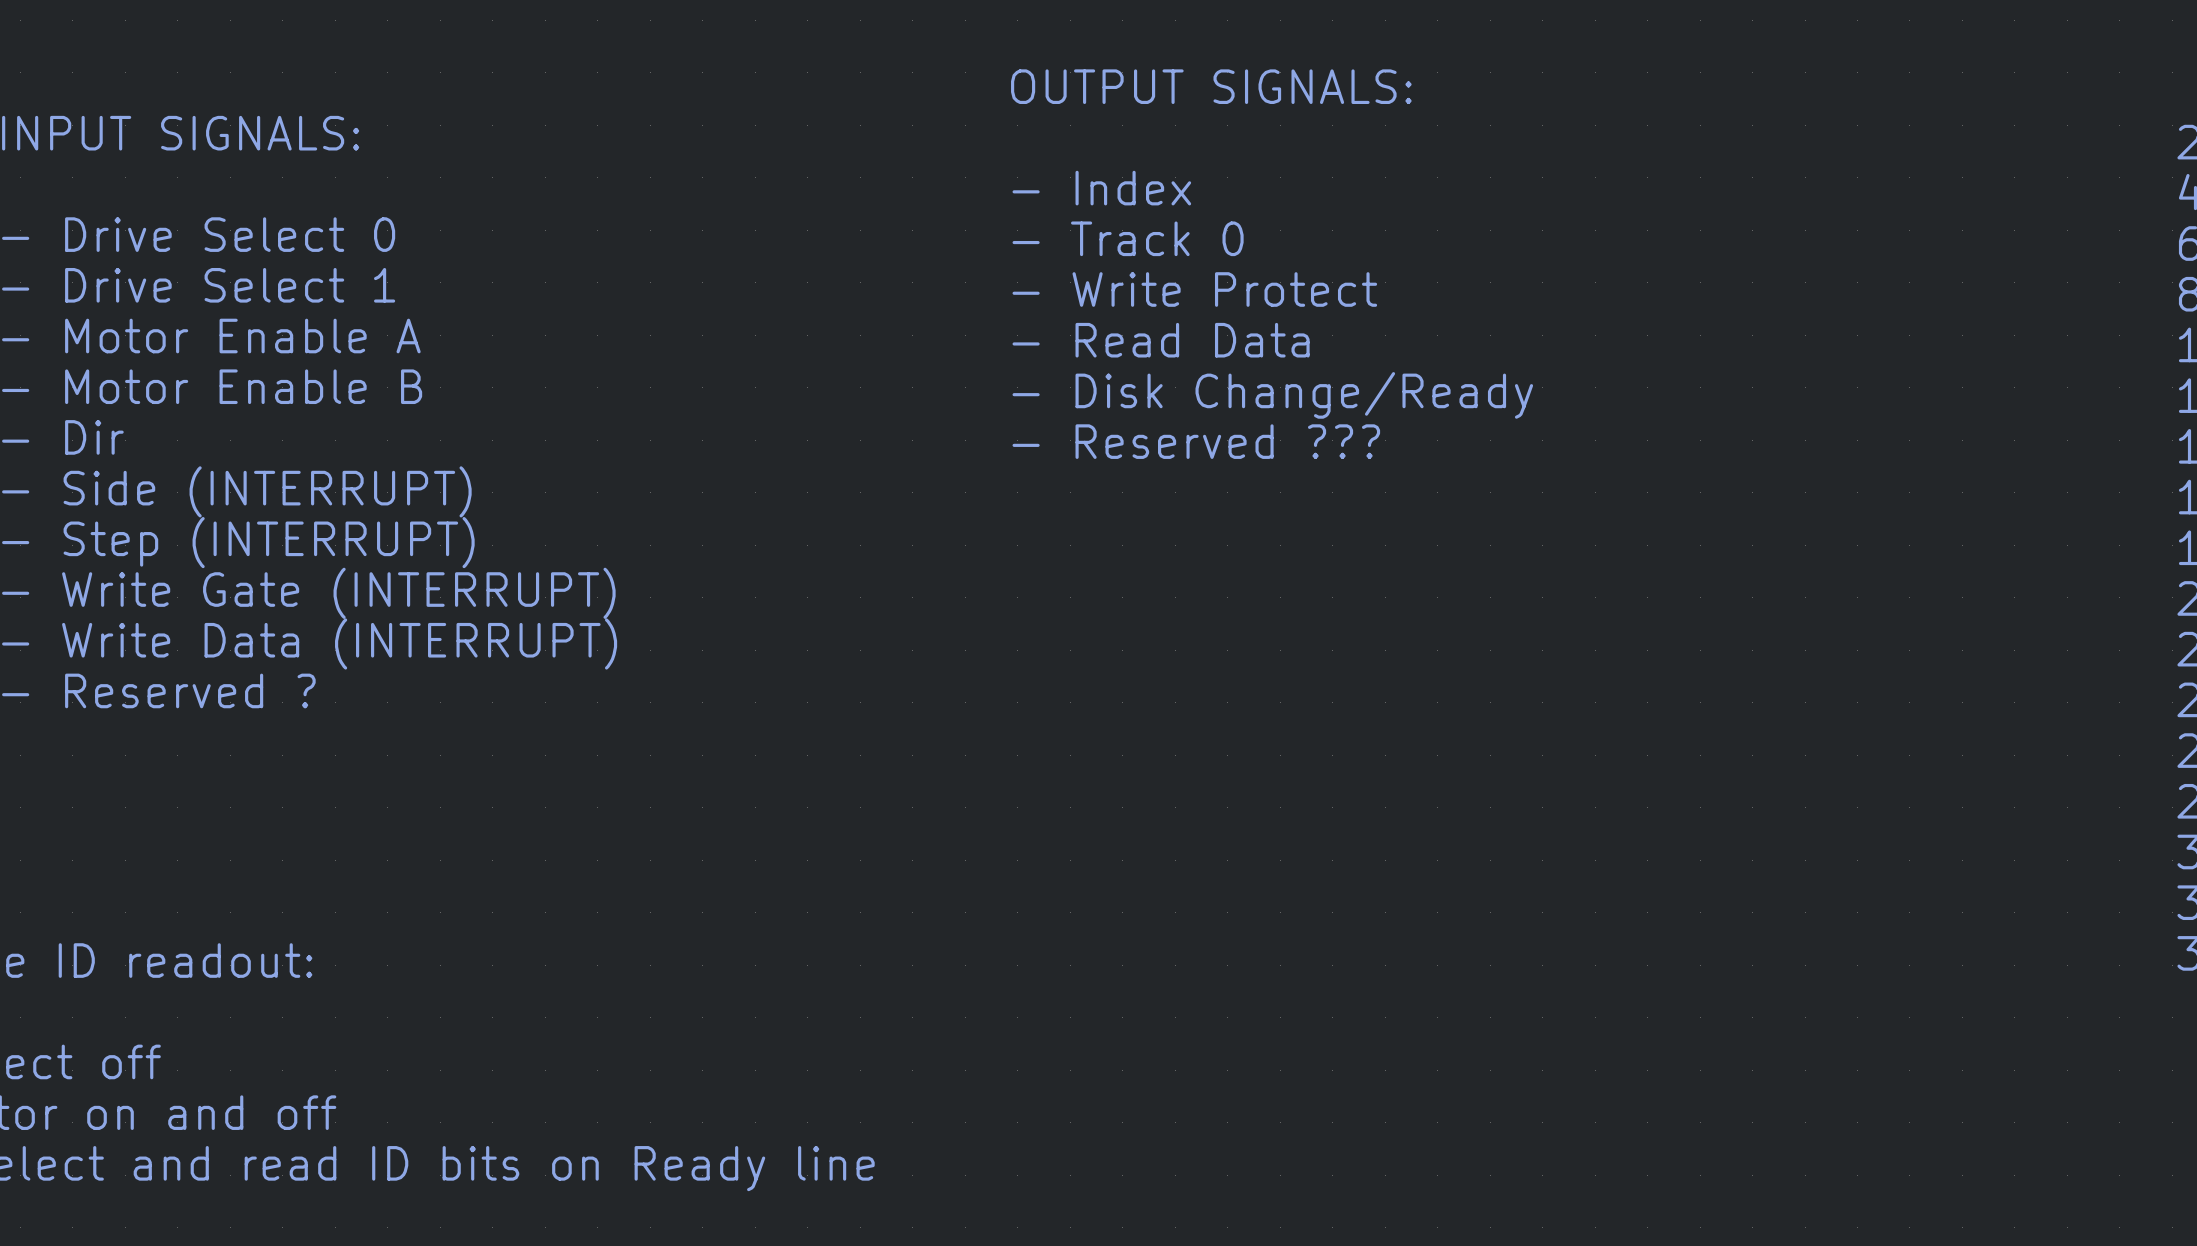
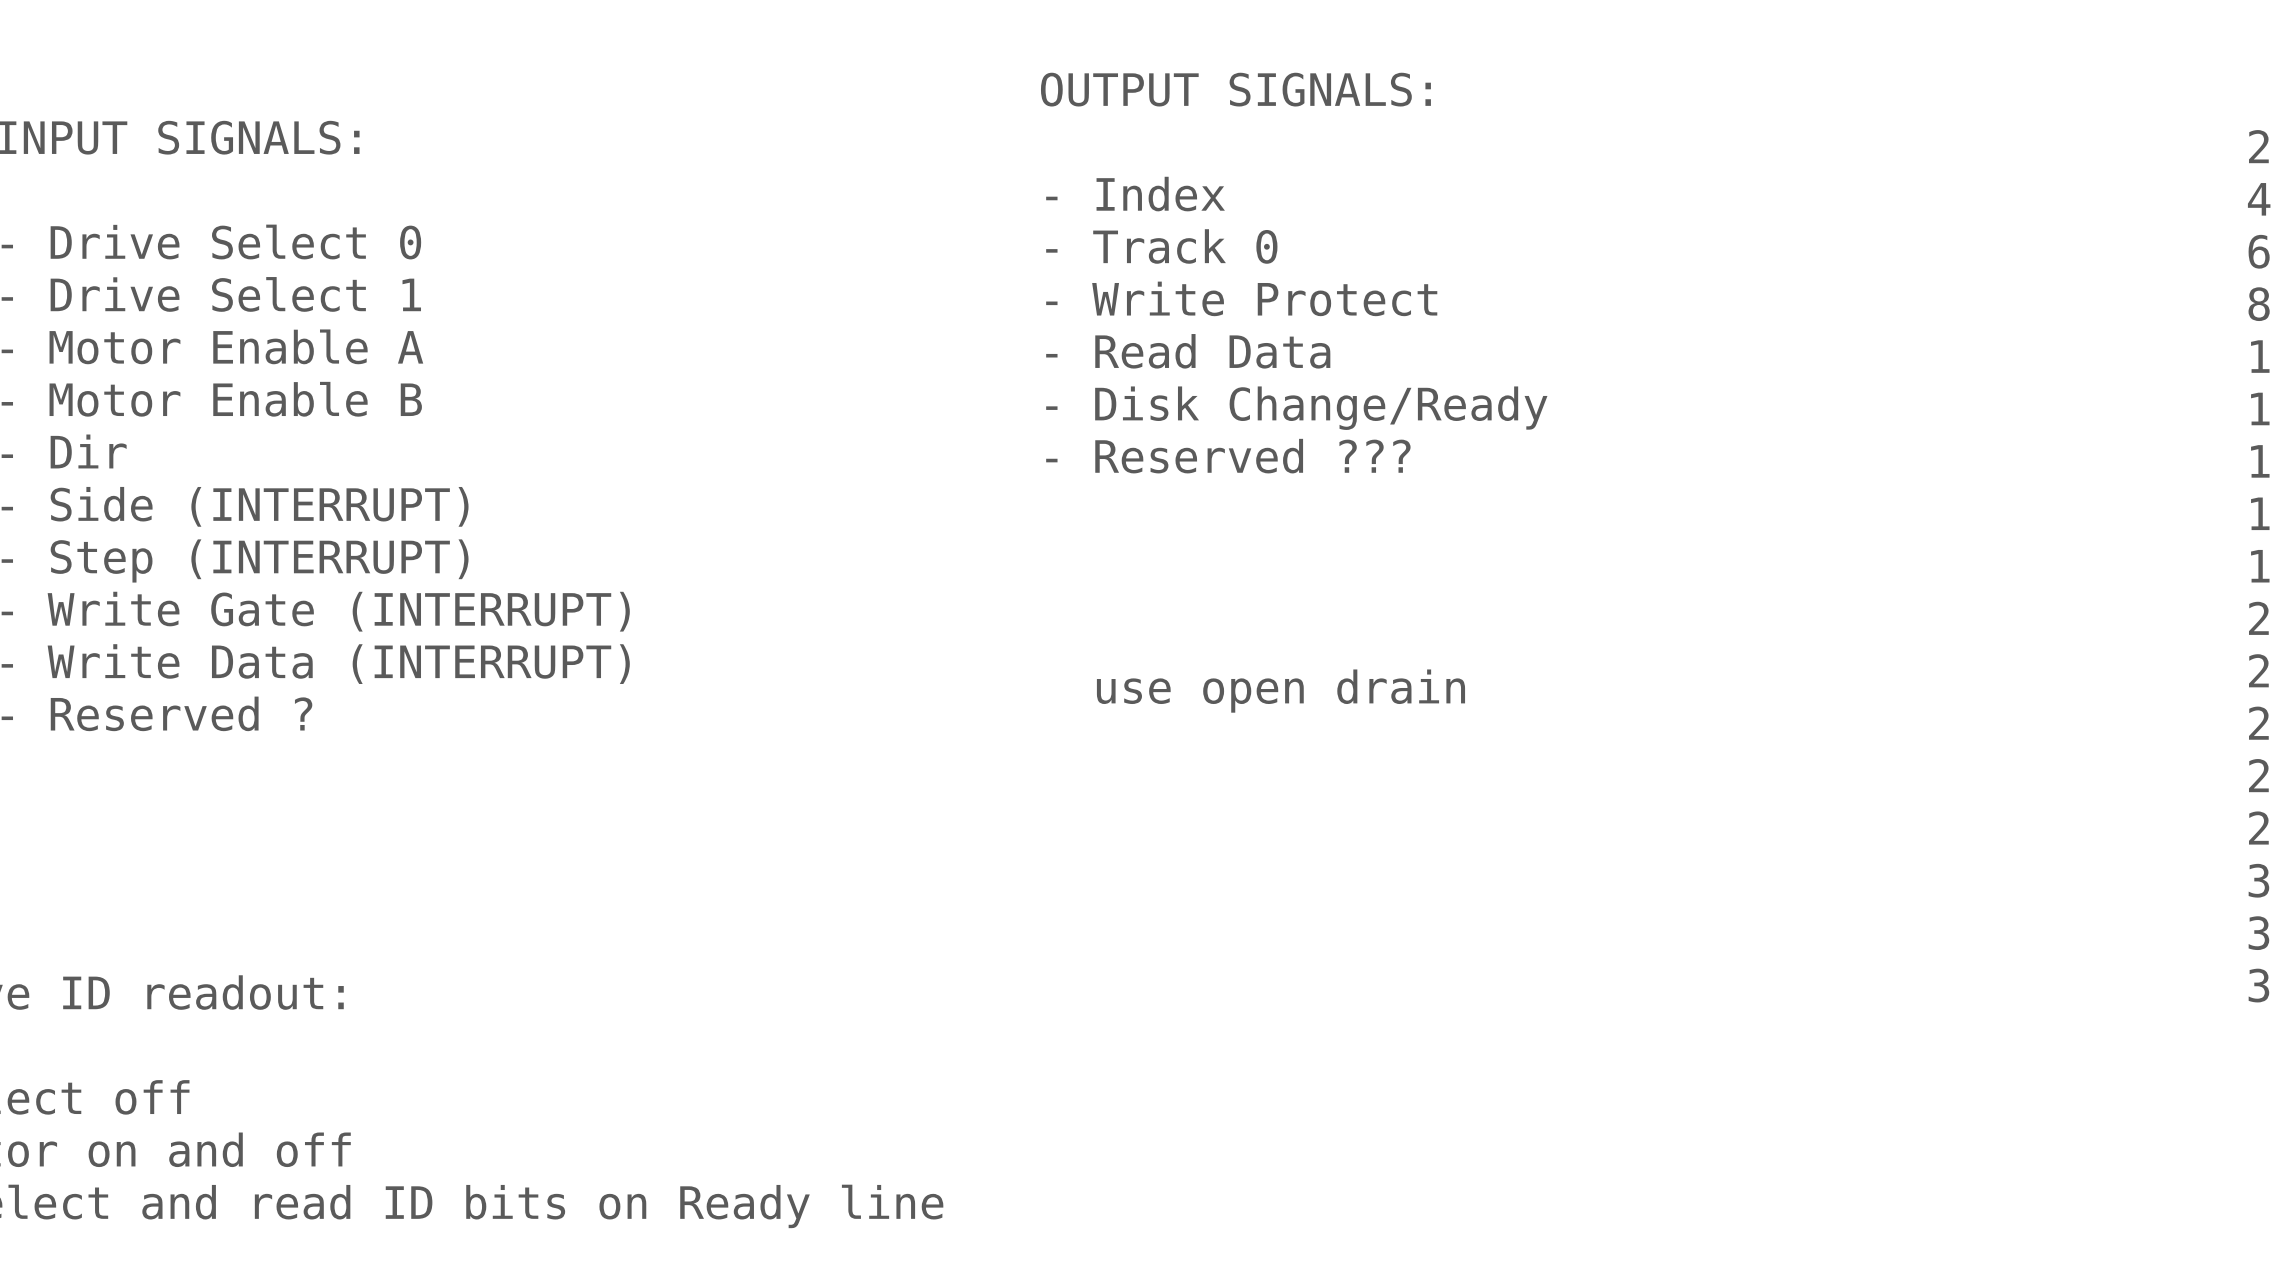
text: none -> use open drain (1280, 691)

